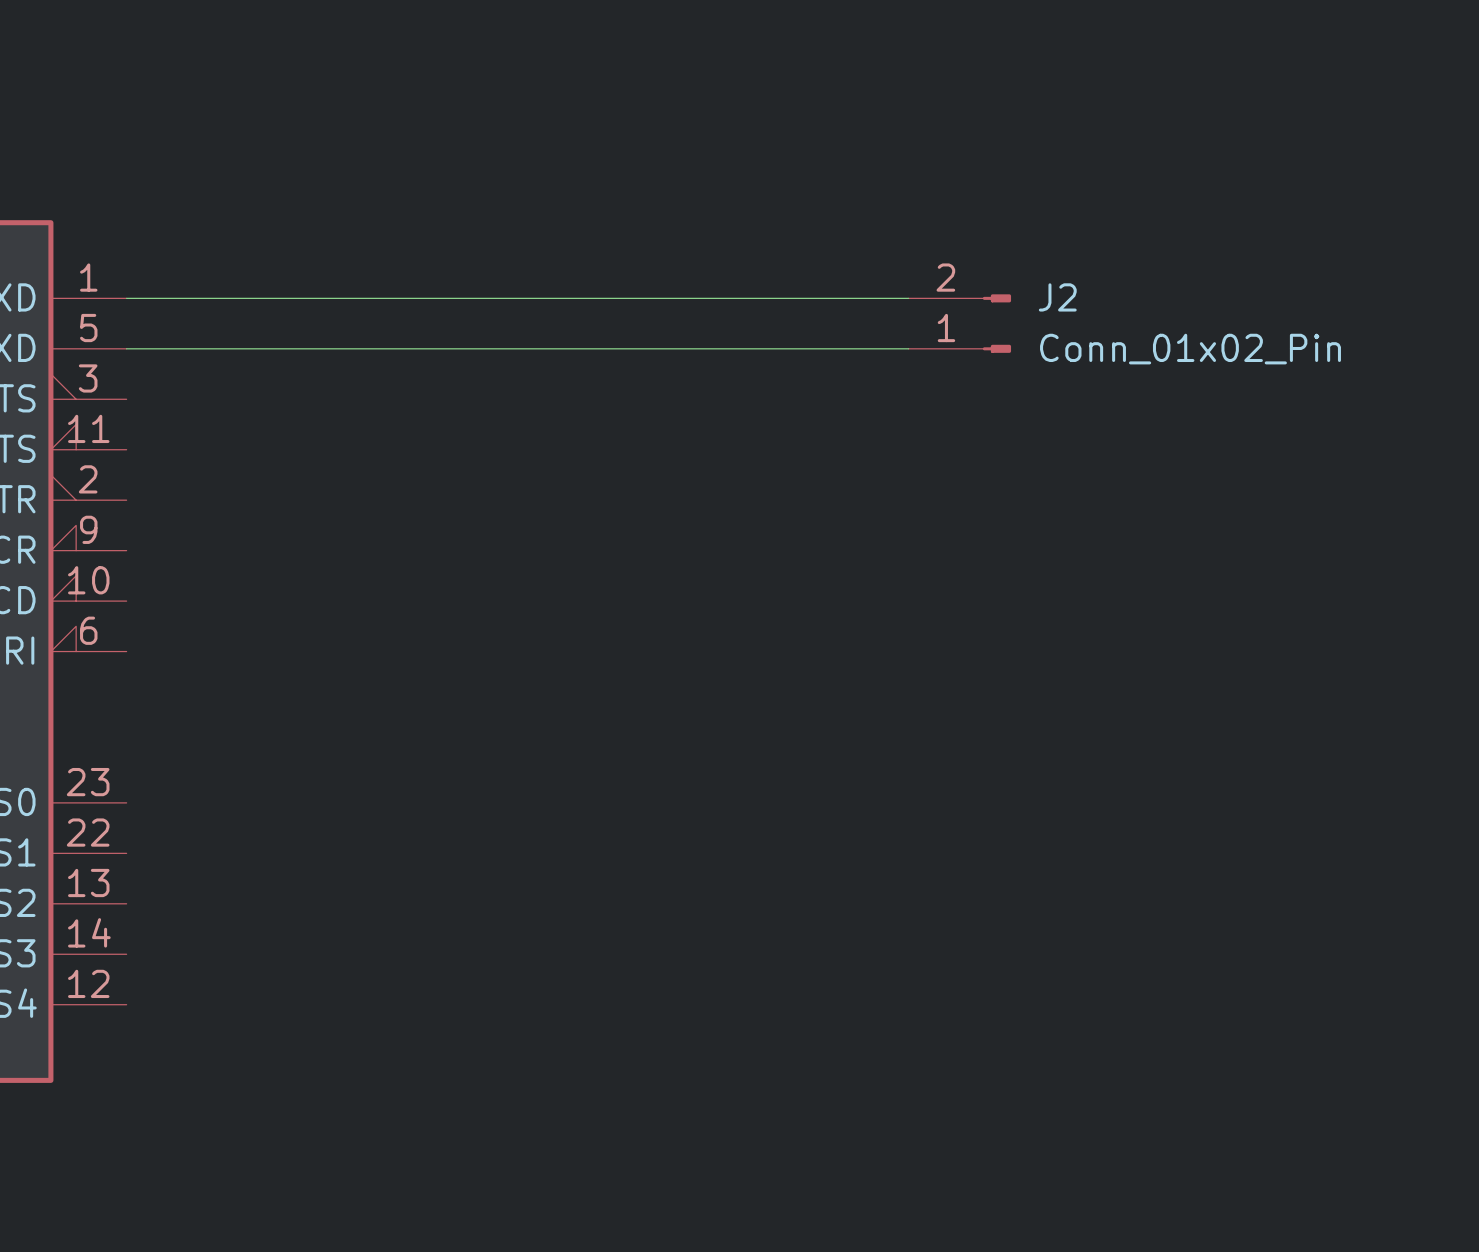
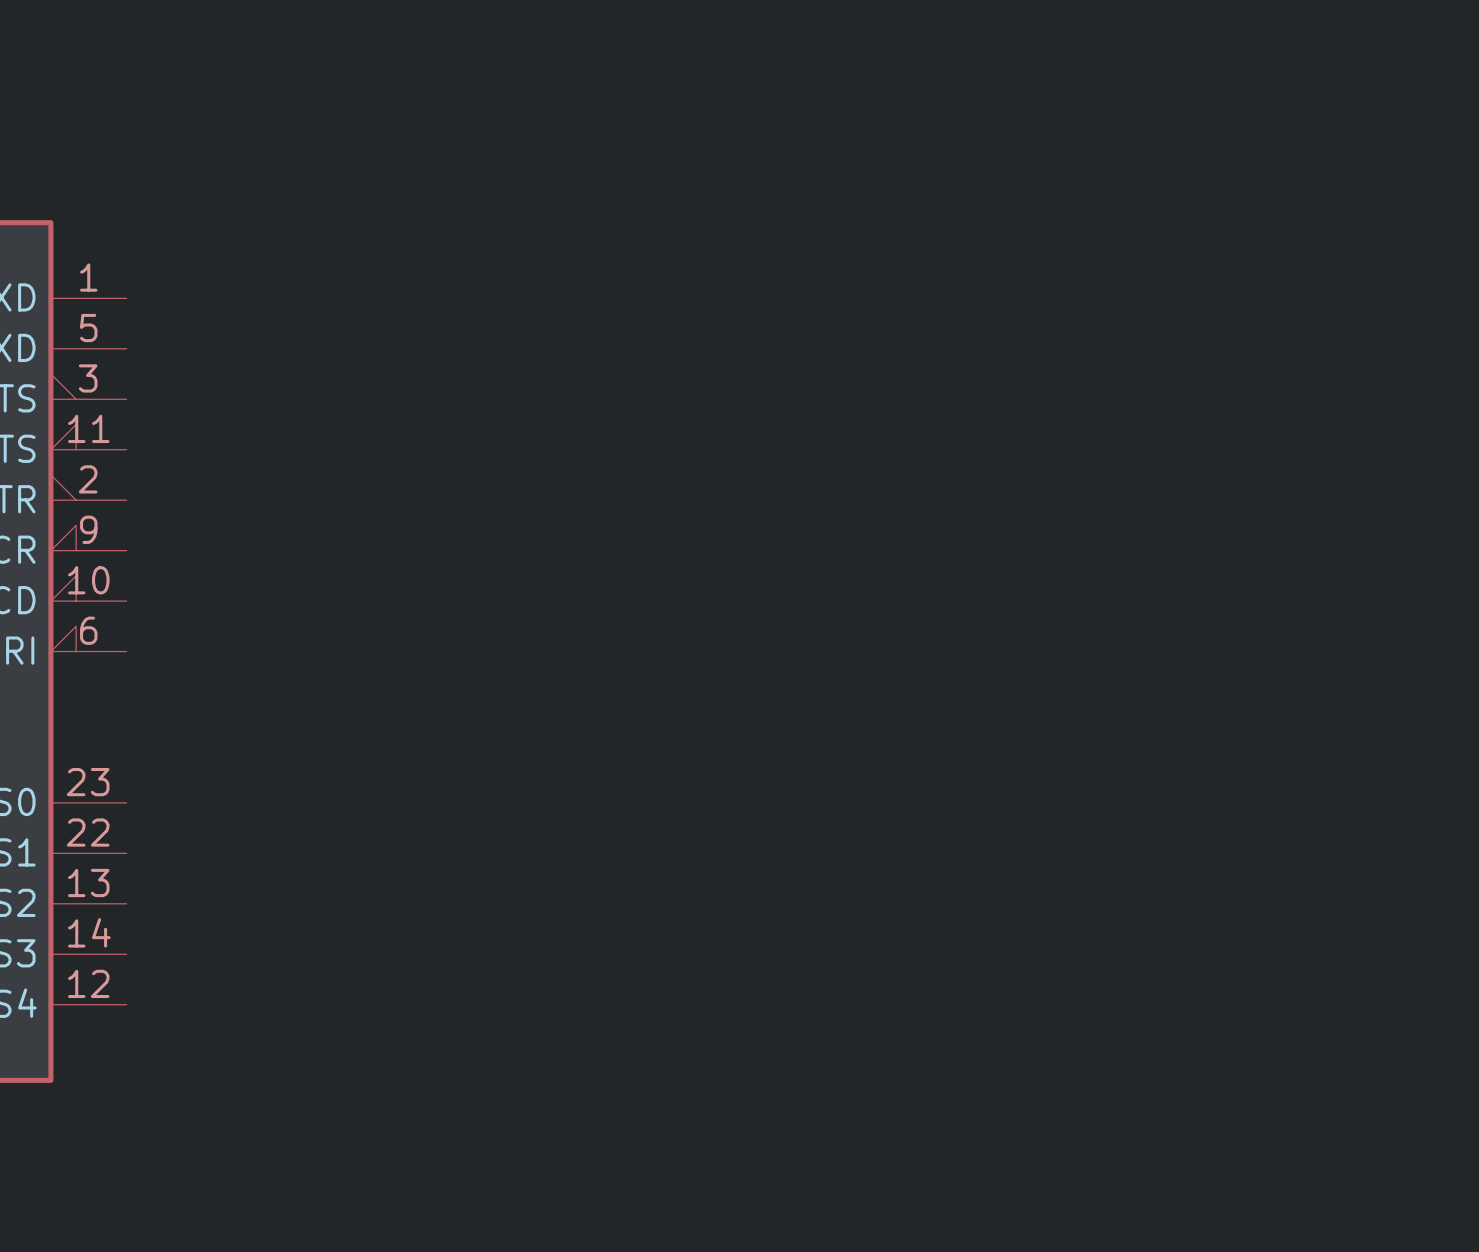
wire: (126, 298) (908, 298) -> none
J2: Conn_01x02_Pin (959, 323) -> none
wire: (126, 348) (908, 348) -> none

